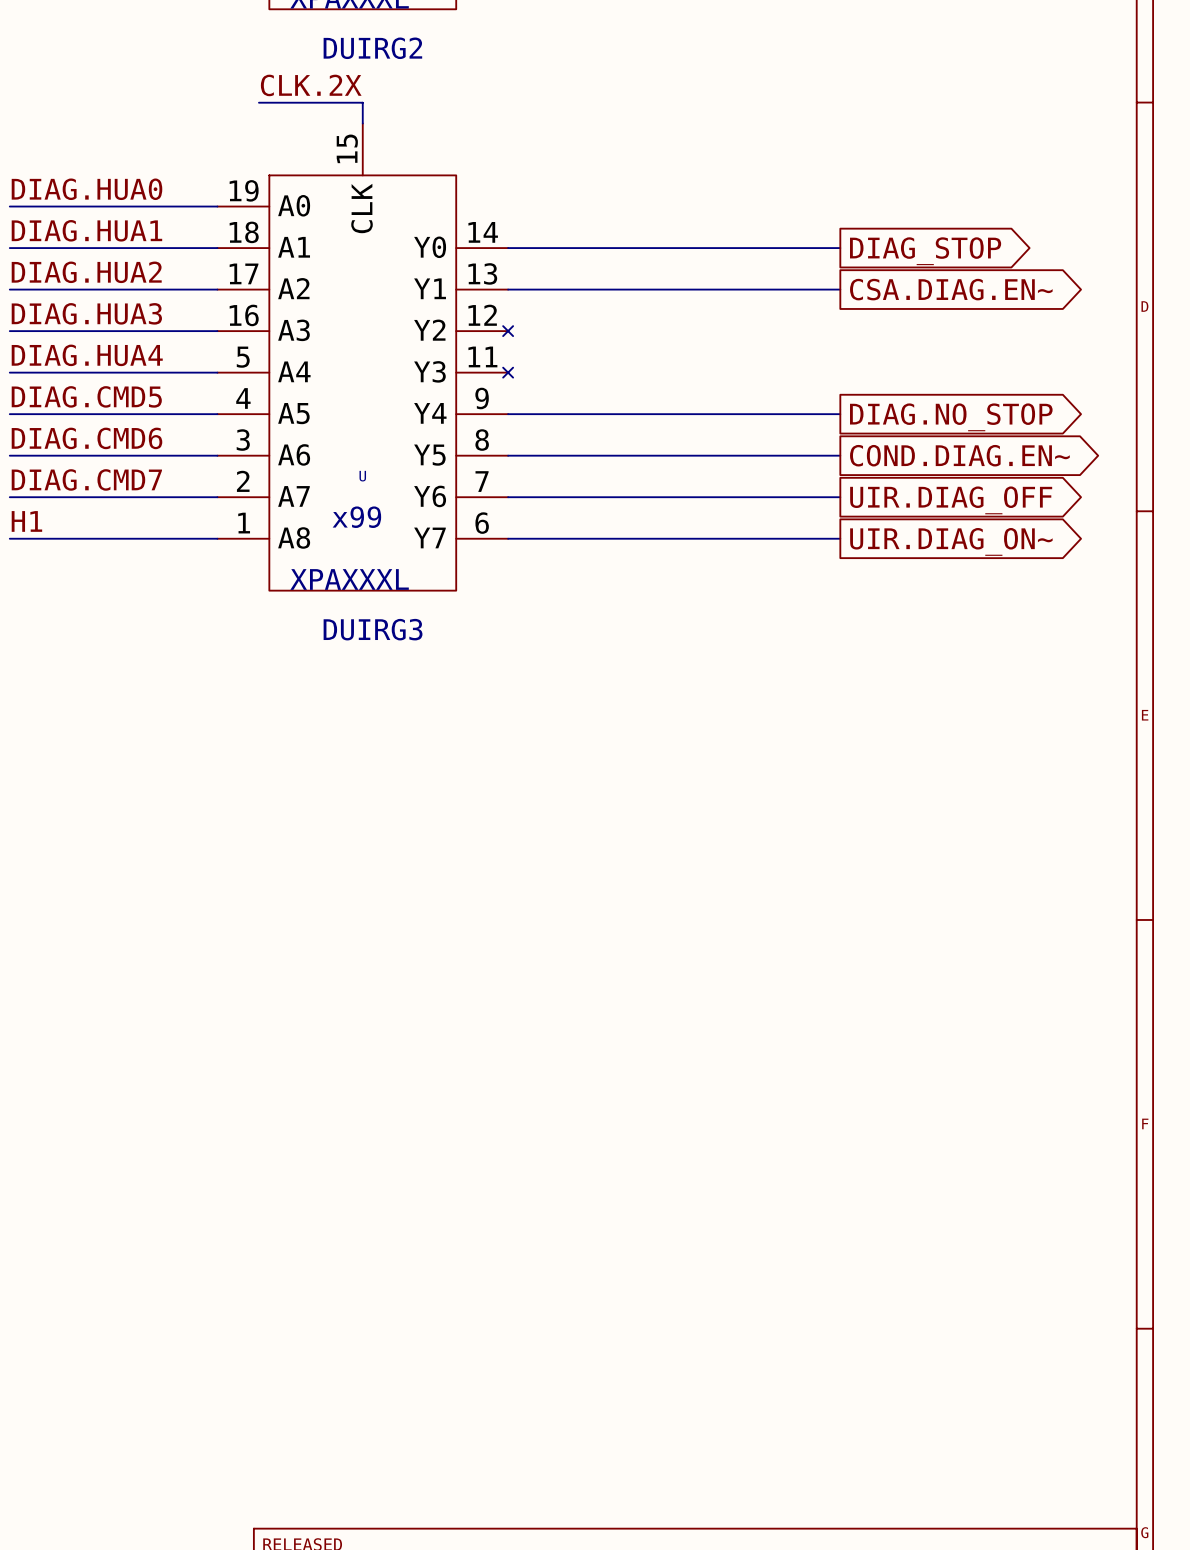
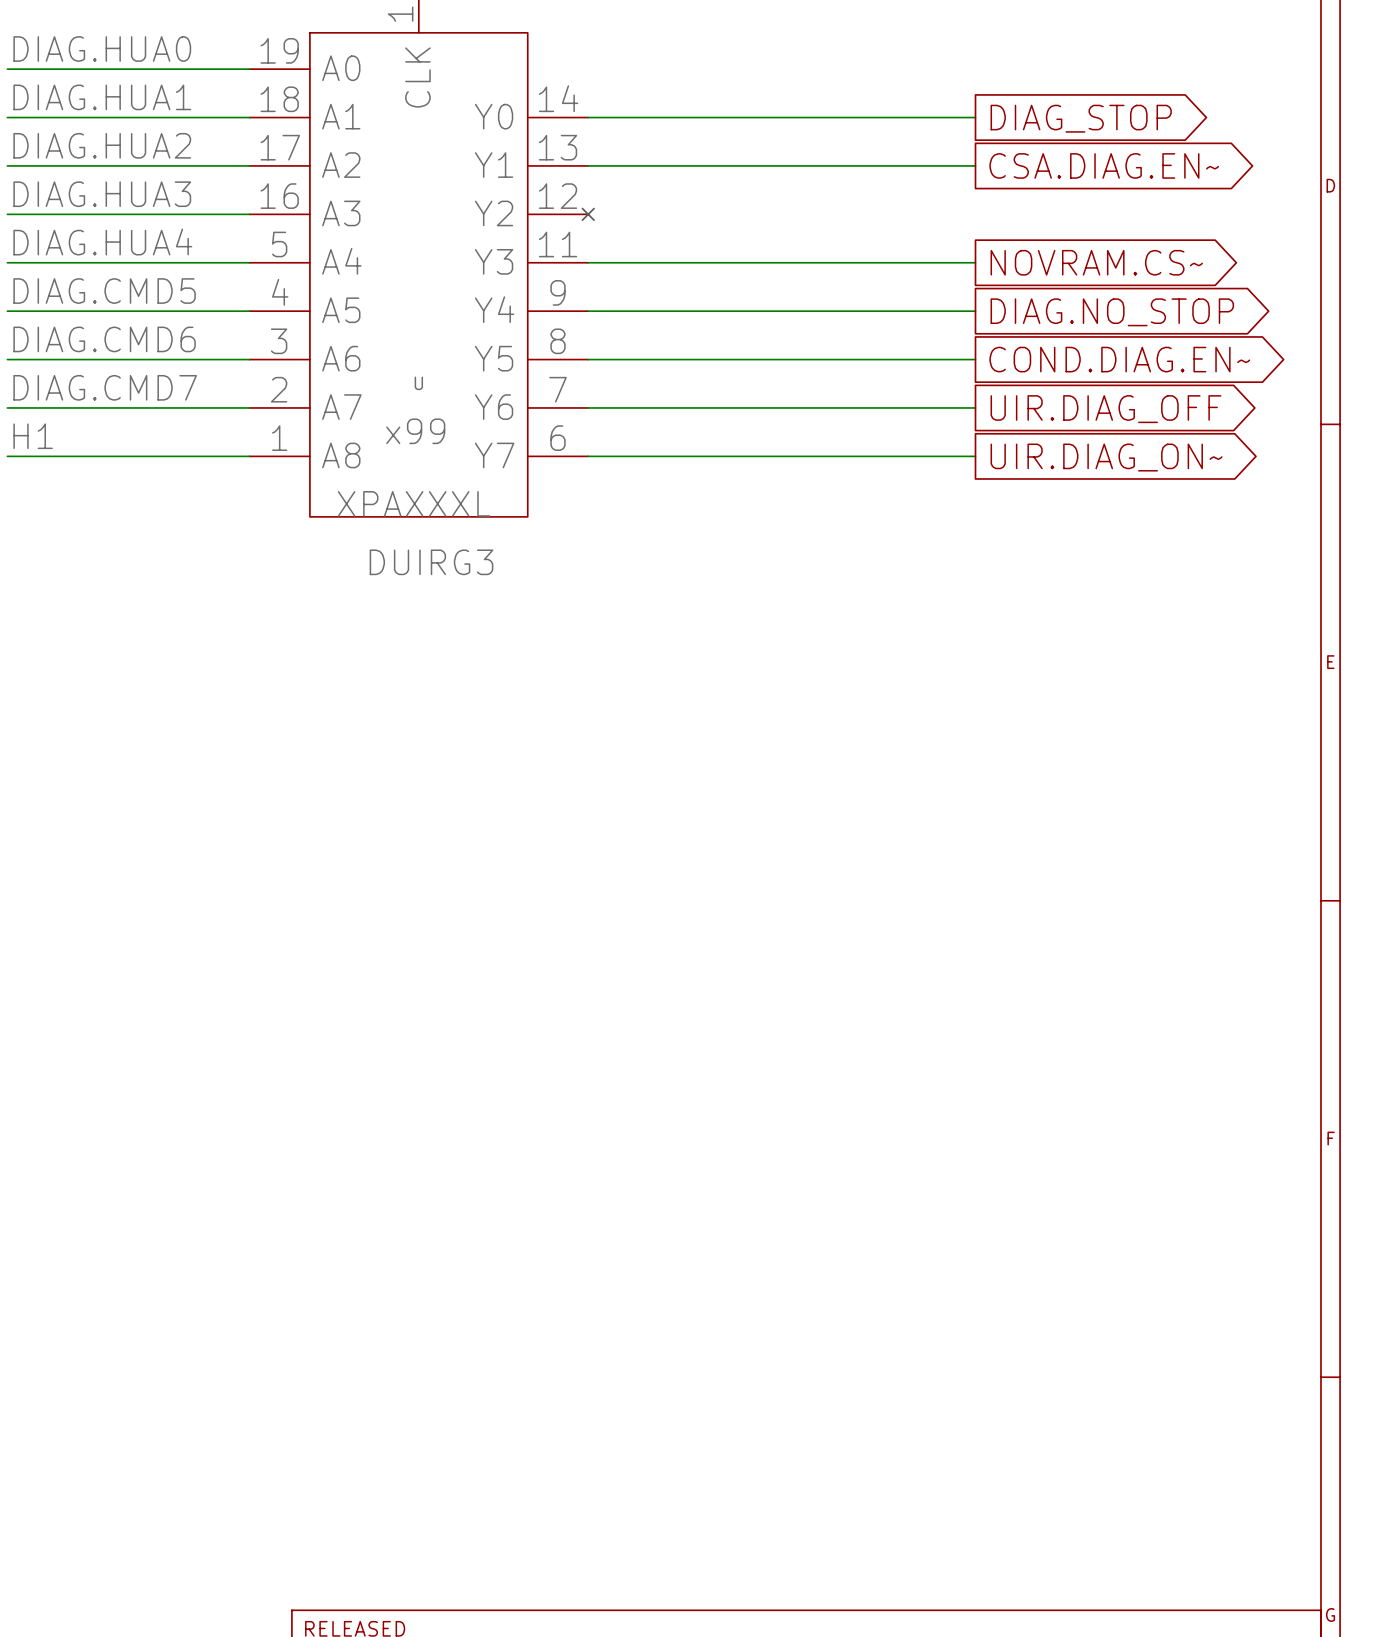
wire: none -> (588, 262) (975, 262)
no-connect mark: (508, 372) -> none
global label: none -> NOVRAM.CS~ (1096, 262)

